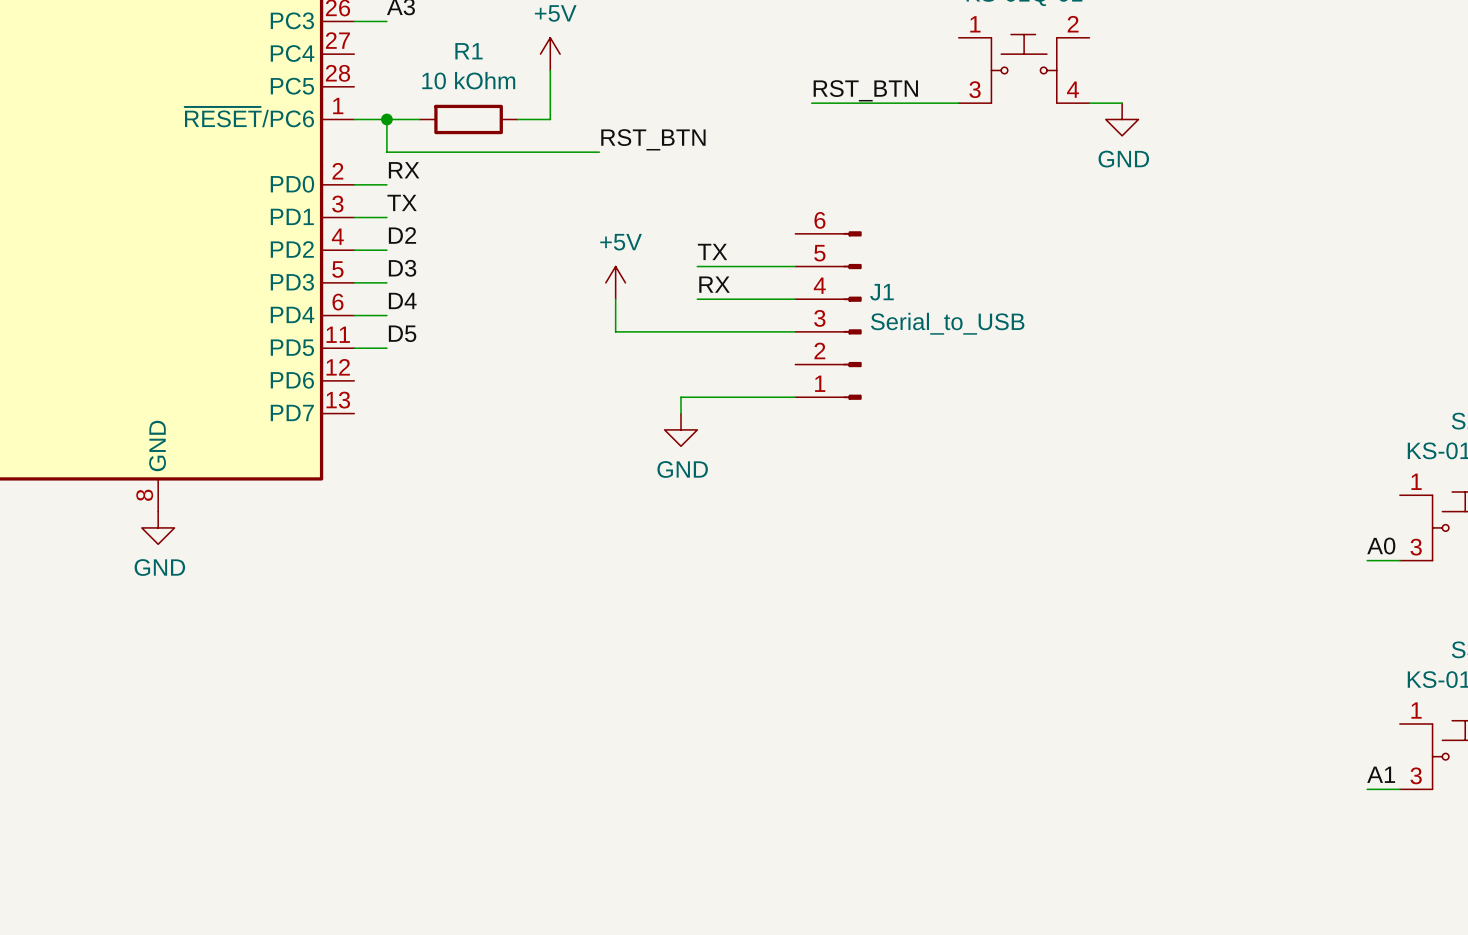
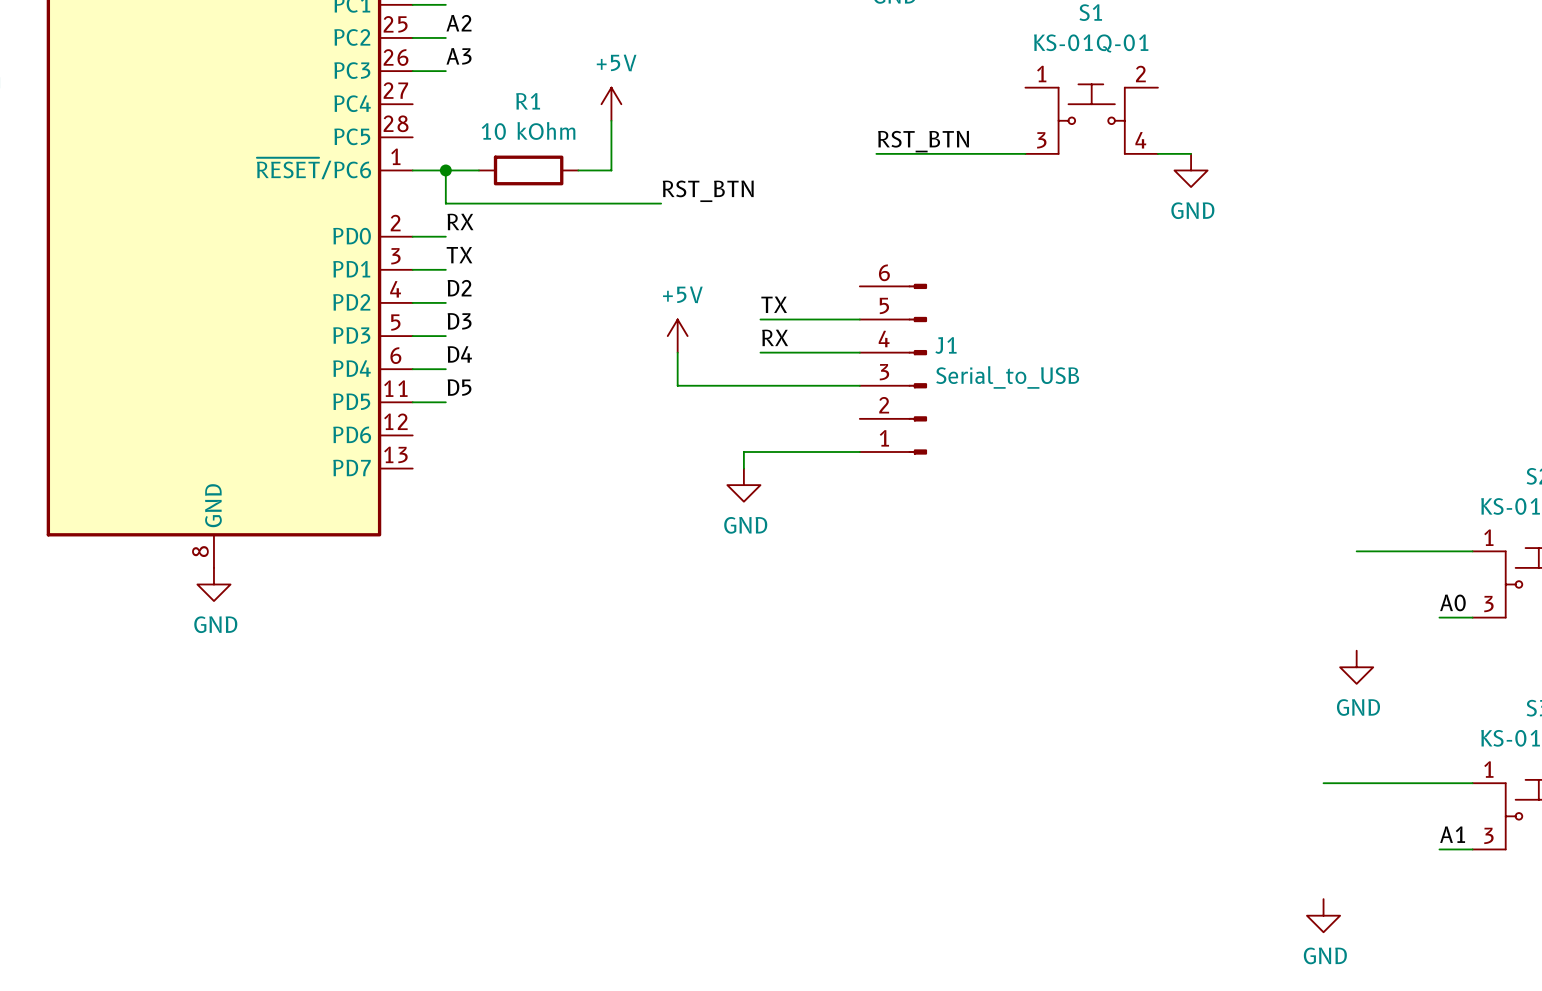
wire: none -> (1356, 551) (1472, 551)
power symbol: none -> GND (1356, 667)
wire: none -> (1323, 783) (1472, 783)
power symbol: none -> GND (1323, 915)

